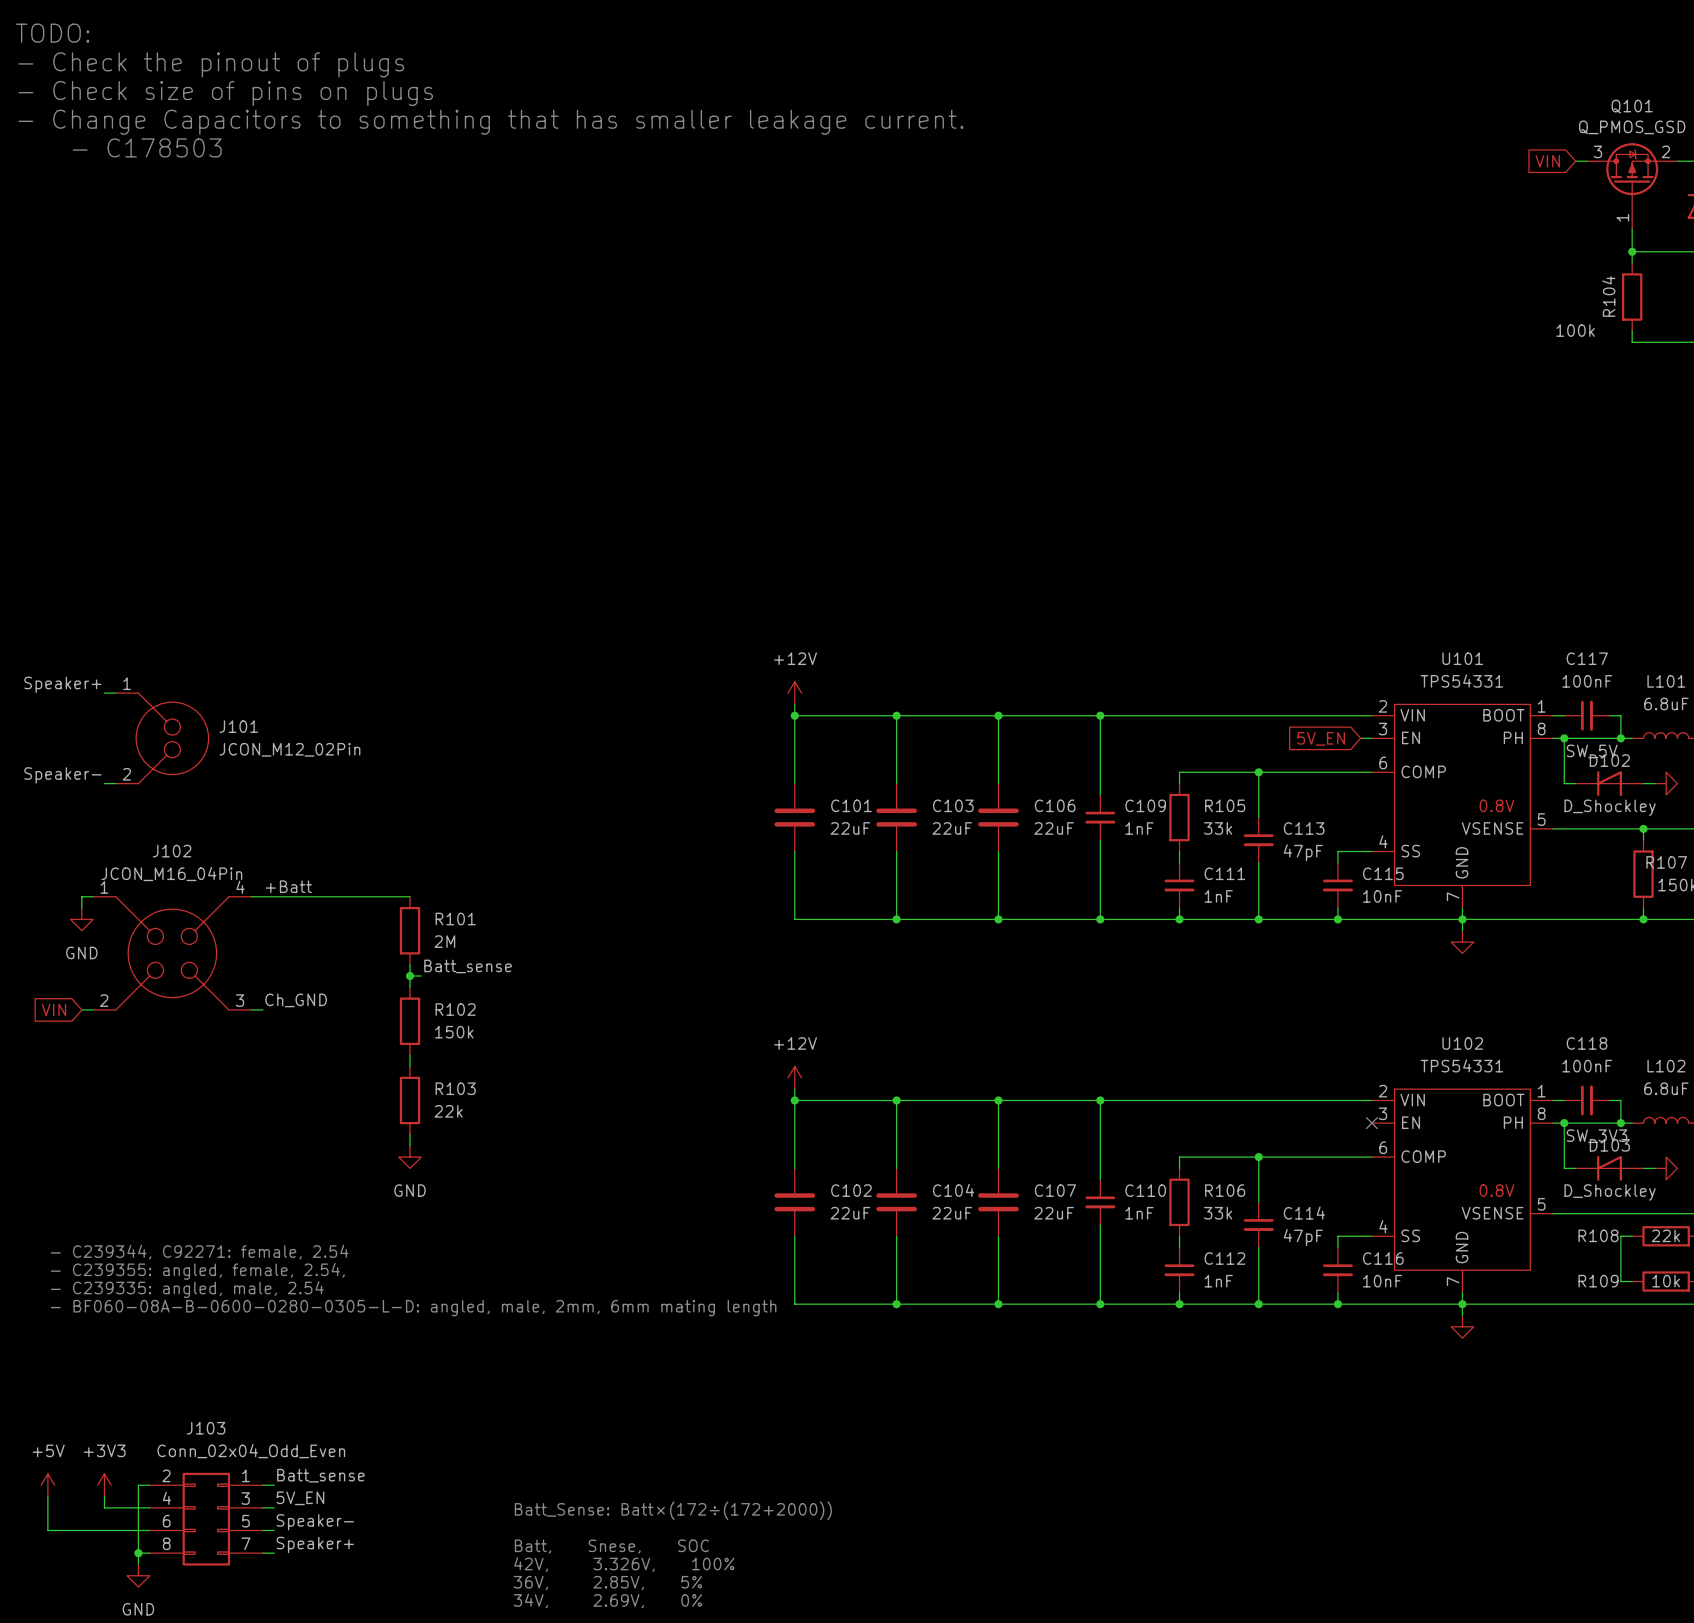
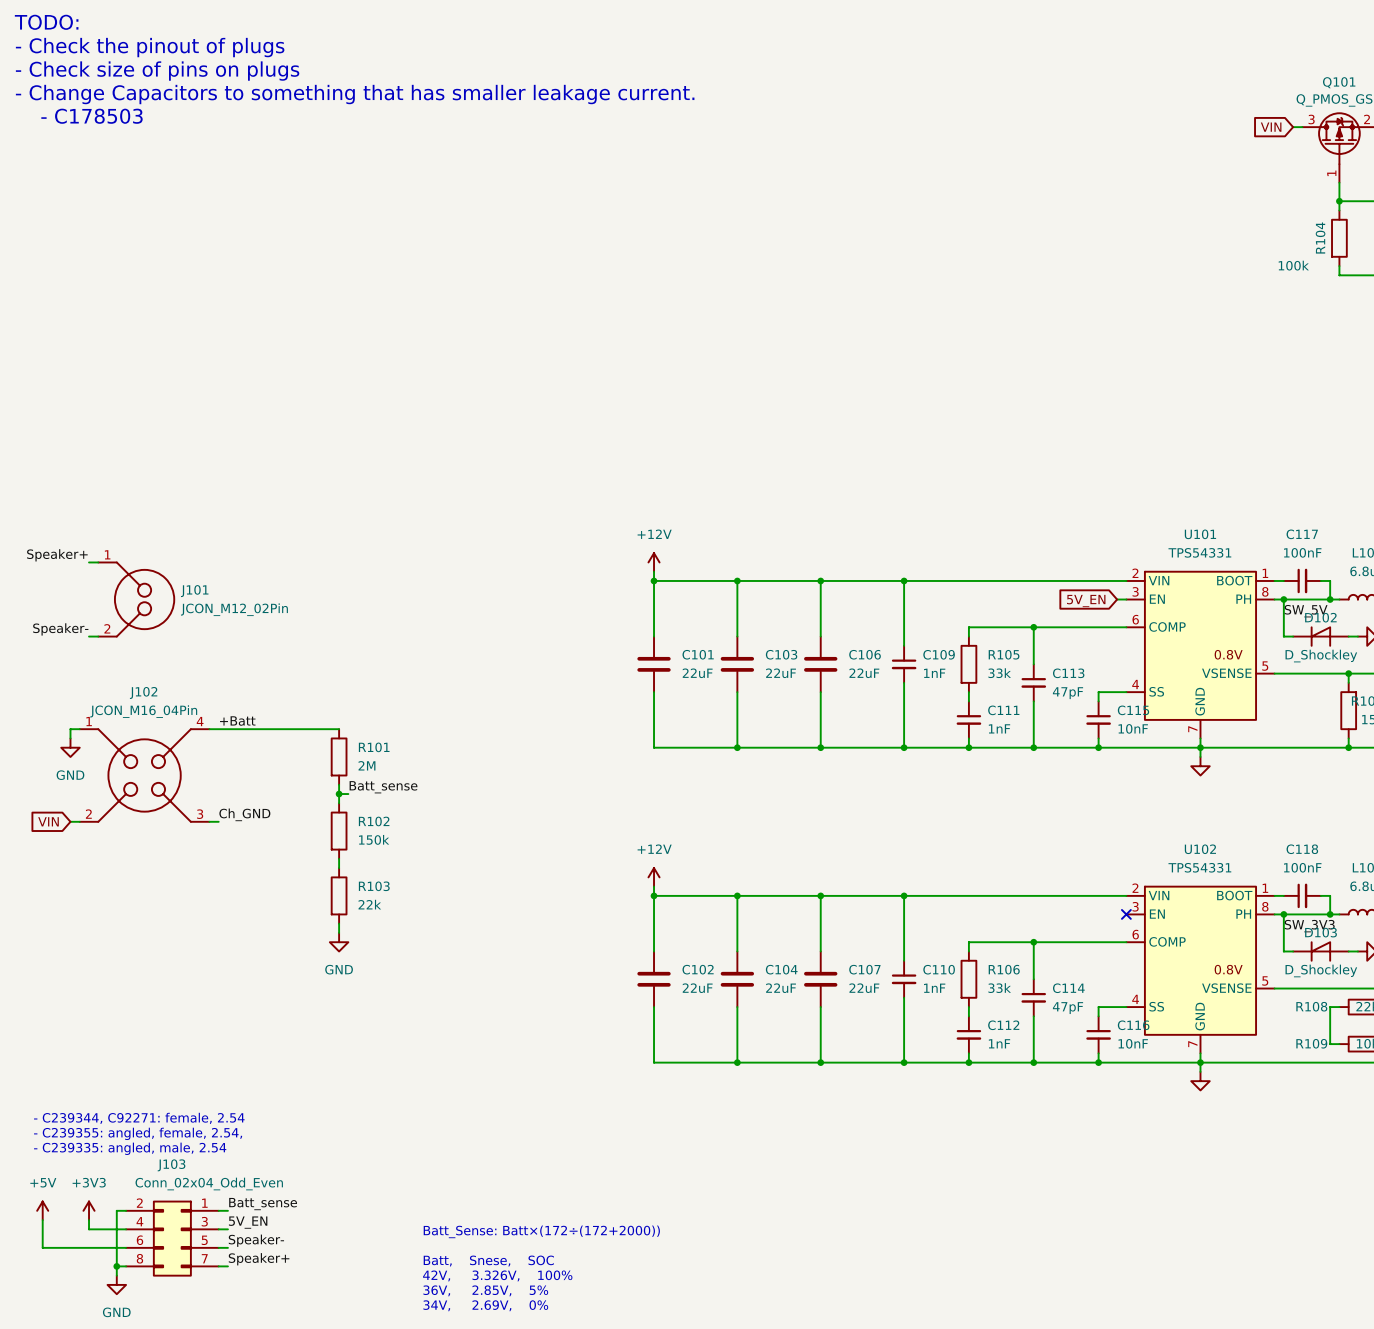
text position: - C239344, C92271: female, 2.54 (199, 1252) -> - C239344, C92271: female, 2.54 (139, 1118)
text position: - C239355: angled, female, 2.54, (197, 1271) -> - C239355: angled, female, 2.54, (138, 1133)
text position: - C239335: angled, male, 2.54 (187, 1289) -> - C239335: angled, male, 2.54 (130, 1148)
text: - BF060-08A-B-0600-0280-0305-L-D: angled, male, 2mm, 6mm mating length (413, 1308) -> none

